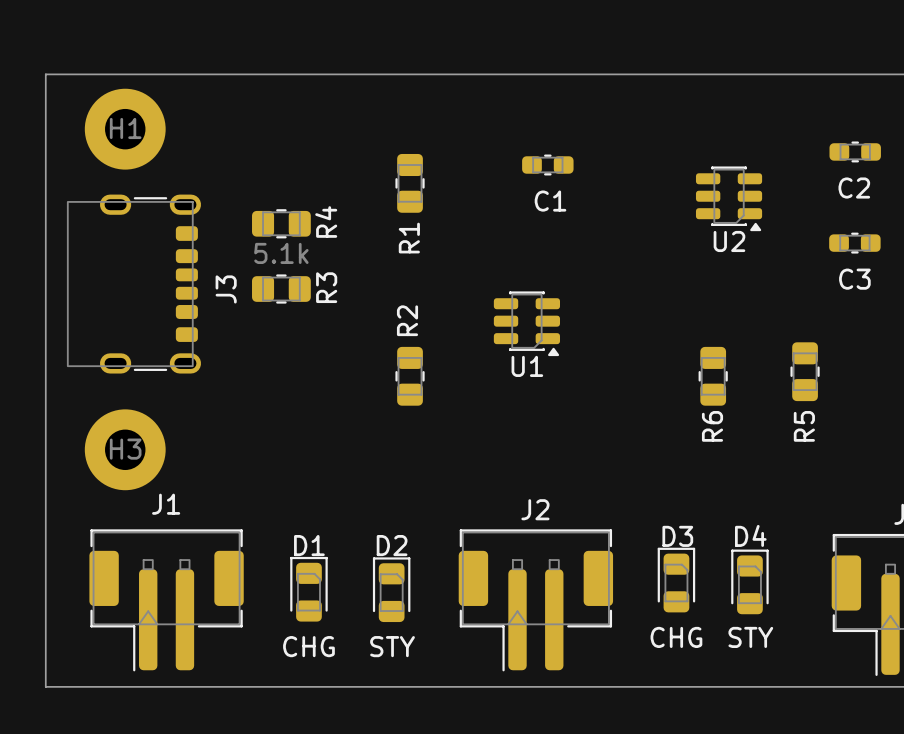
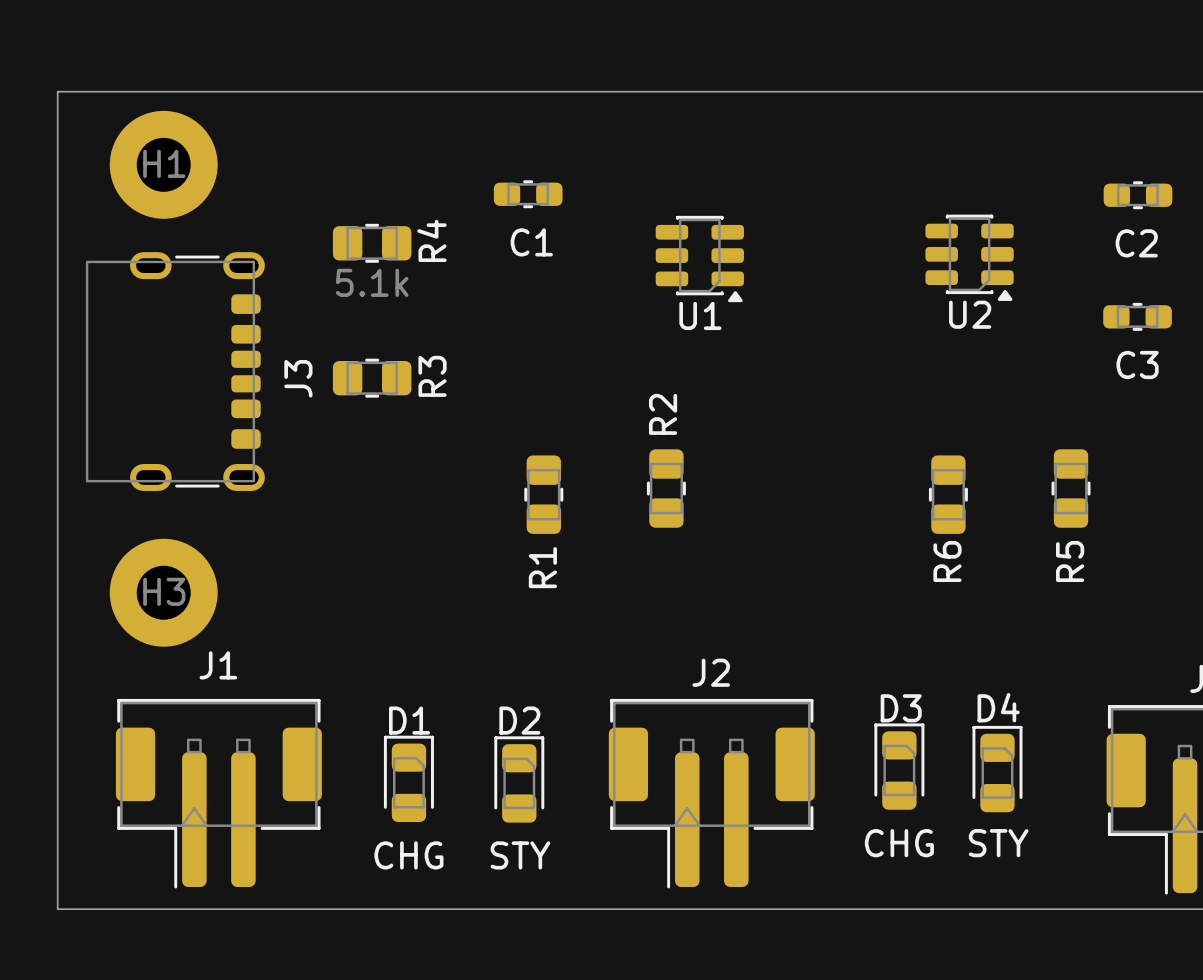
C1 position: (547, 165) -> (528, 194)
R1: (410, 183) -> none
R4 position: (281, 223) -> (372, 243)
R2 name: R2 (407, 320) -> R1 (542, 567)
U1 position: (526, 323) -> (699, 259)
R2: none -> (666, 488)

